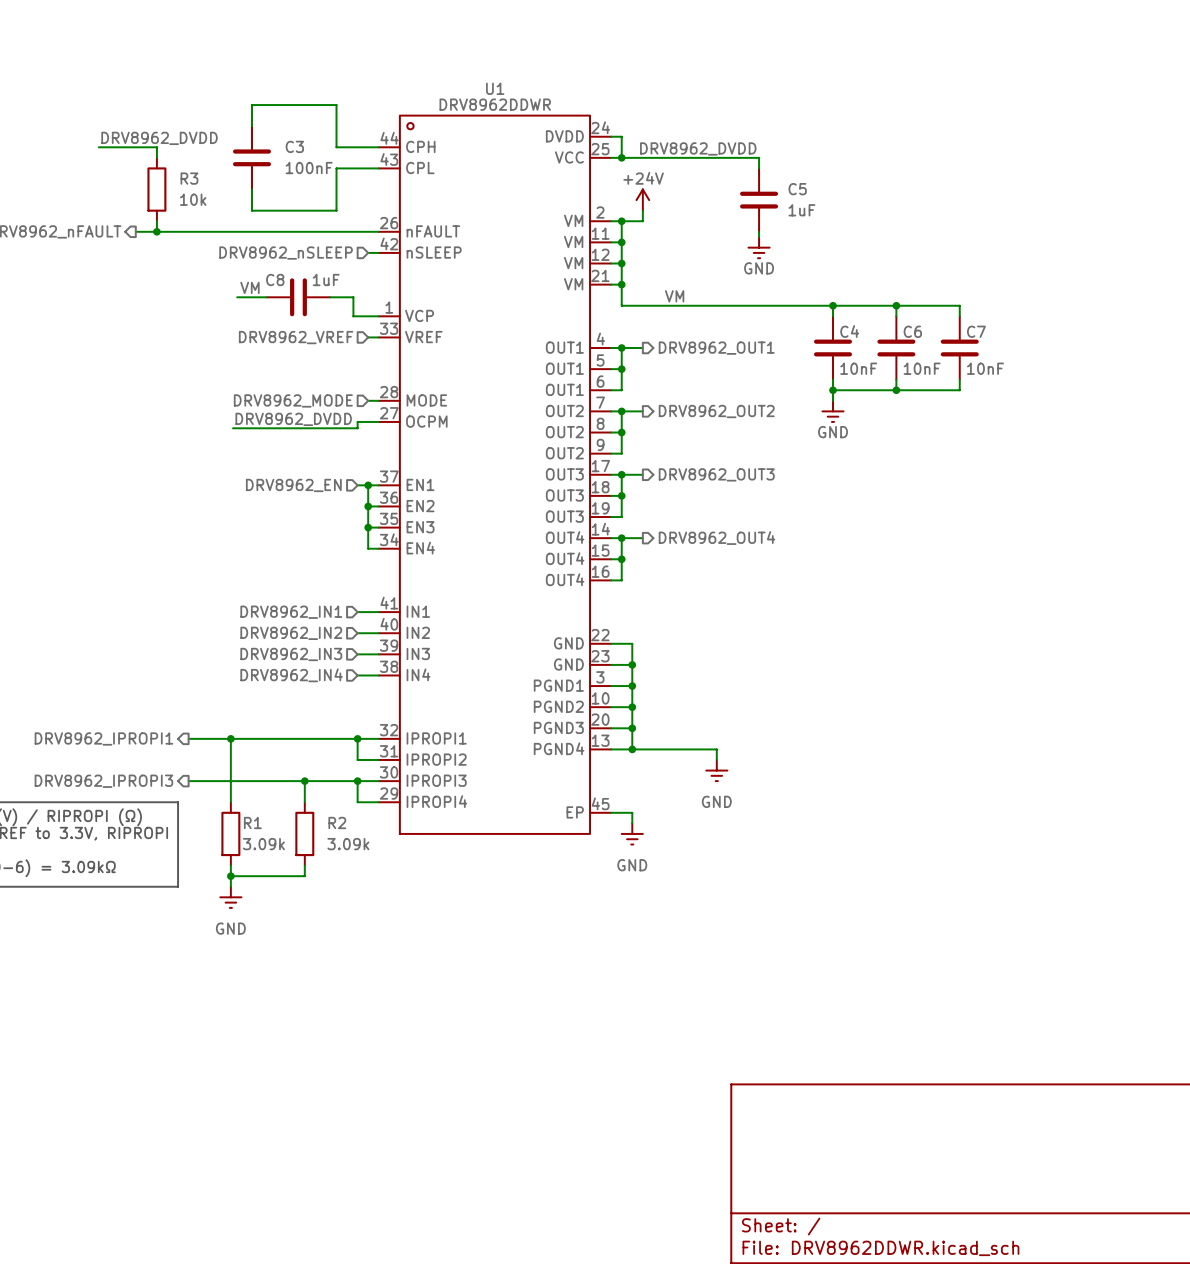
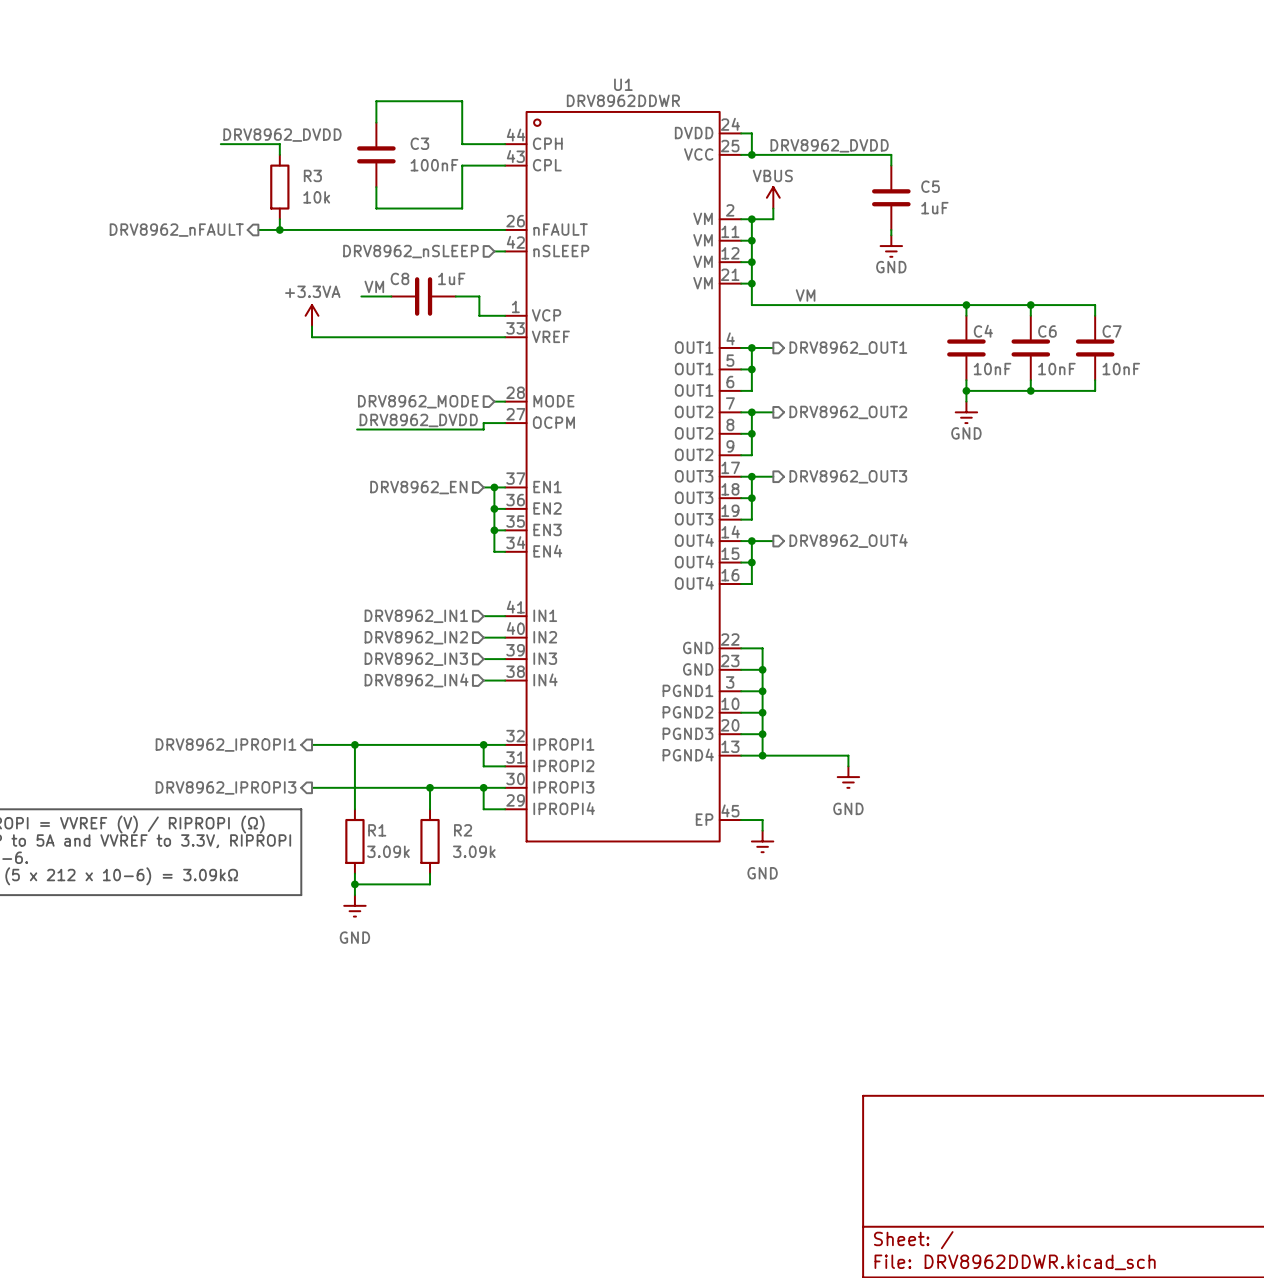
power symbol: +24V (642, 200) -> VBUS (773, 197)
power symbol: none -> +3.3VA (312, 315)
wire: none -> (312, 326) (312, 337) (494, 337)
hierarchical label: DRV8962_VREF (296, 337) -> none

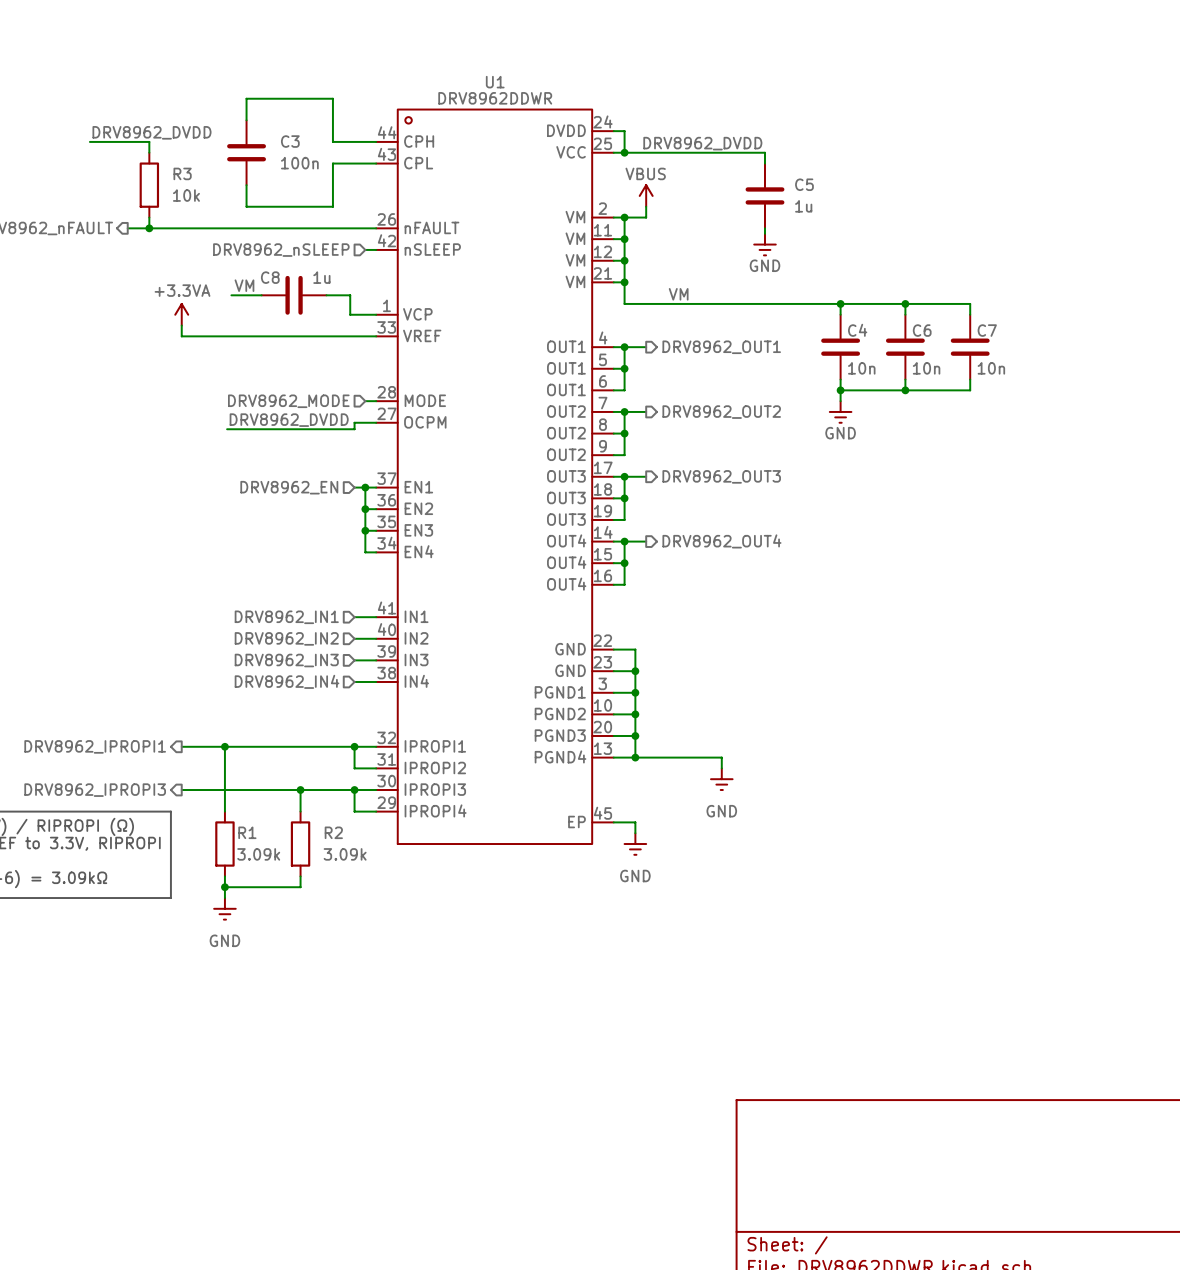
C3 value: 100nF (434, 165) -> 100n (299, 163)
C5 value: 1uF (934, 208) -> 1u (803, 206)
C8 value: 1uF (451, 278) -> 1u (321, 277)
C4 value: 10nF (992, 369) -> 10n (861, 368)
C6 value: 10nF (1056, 369) -> 10n (926, 368)
C7 value: 10nF (1121, 369) -> 10n (991, 368)

